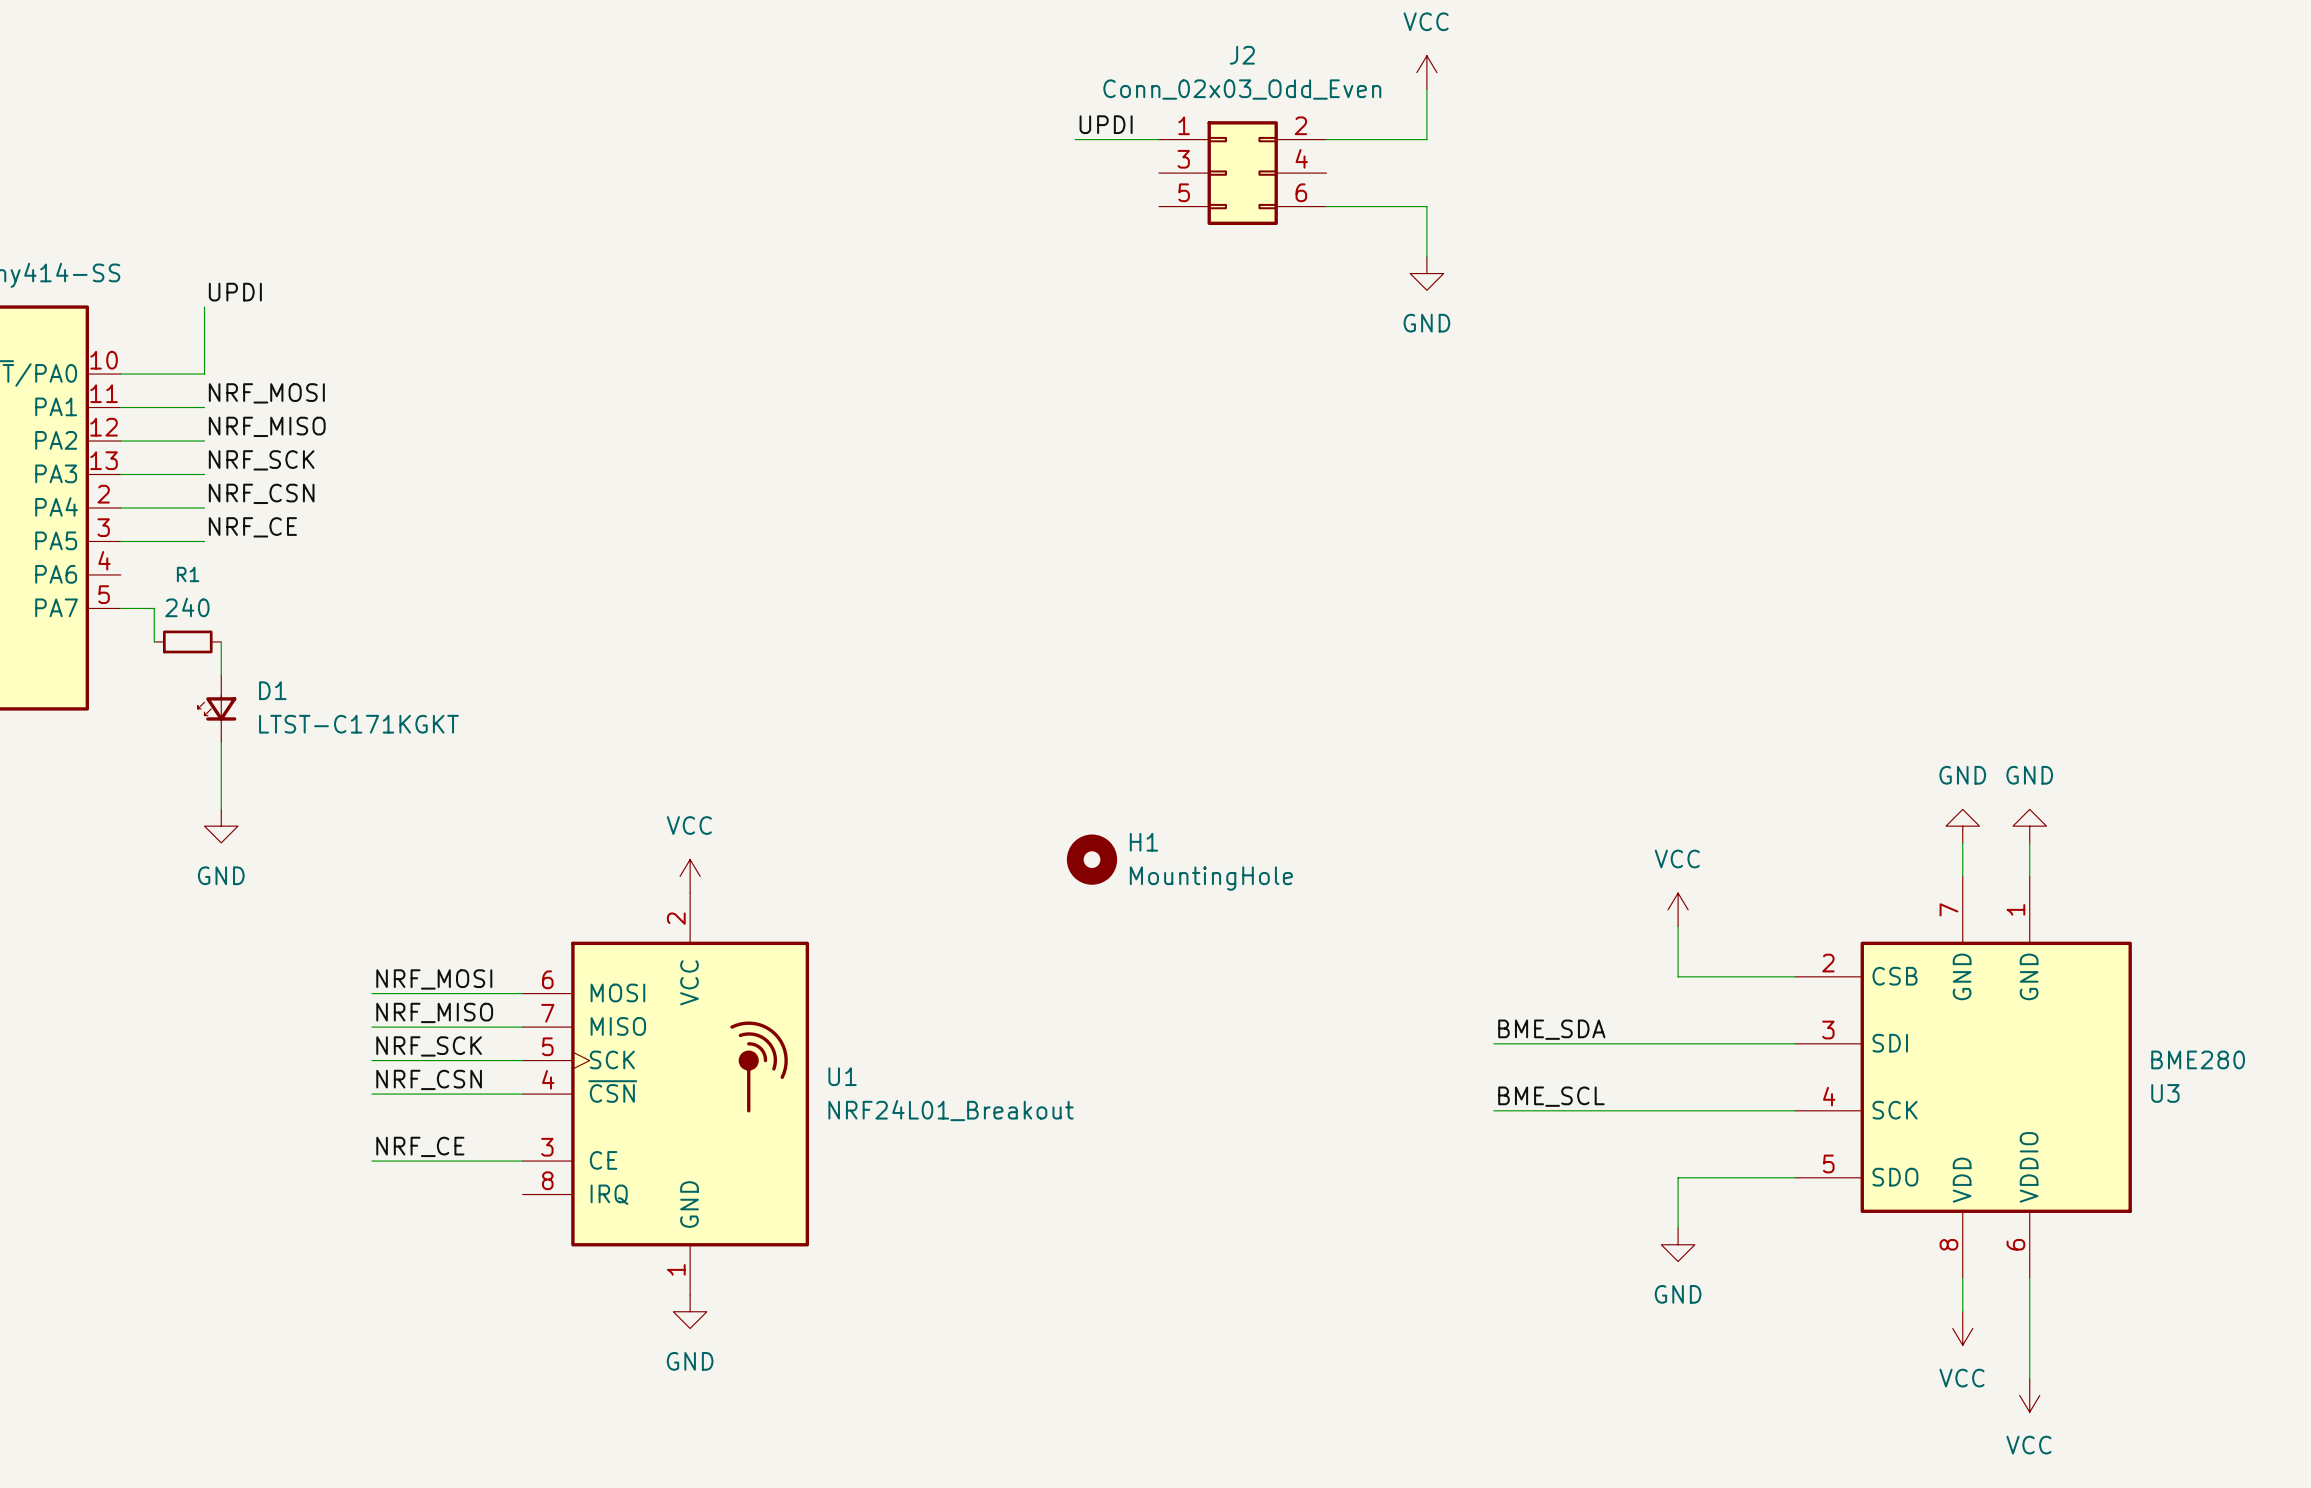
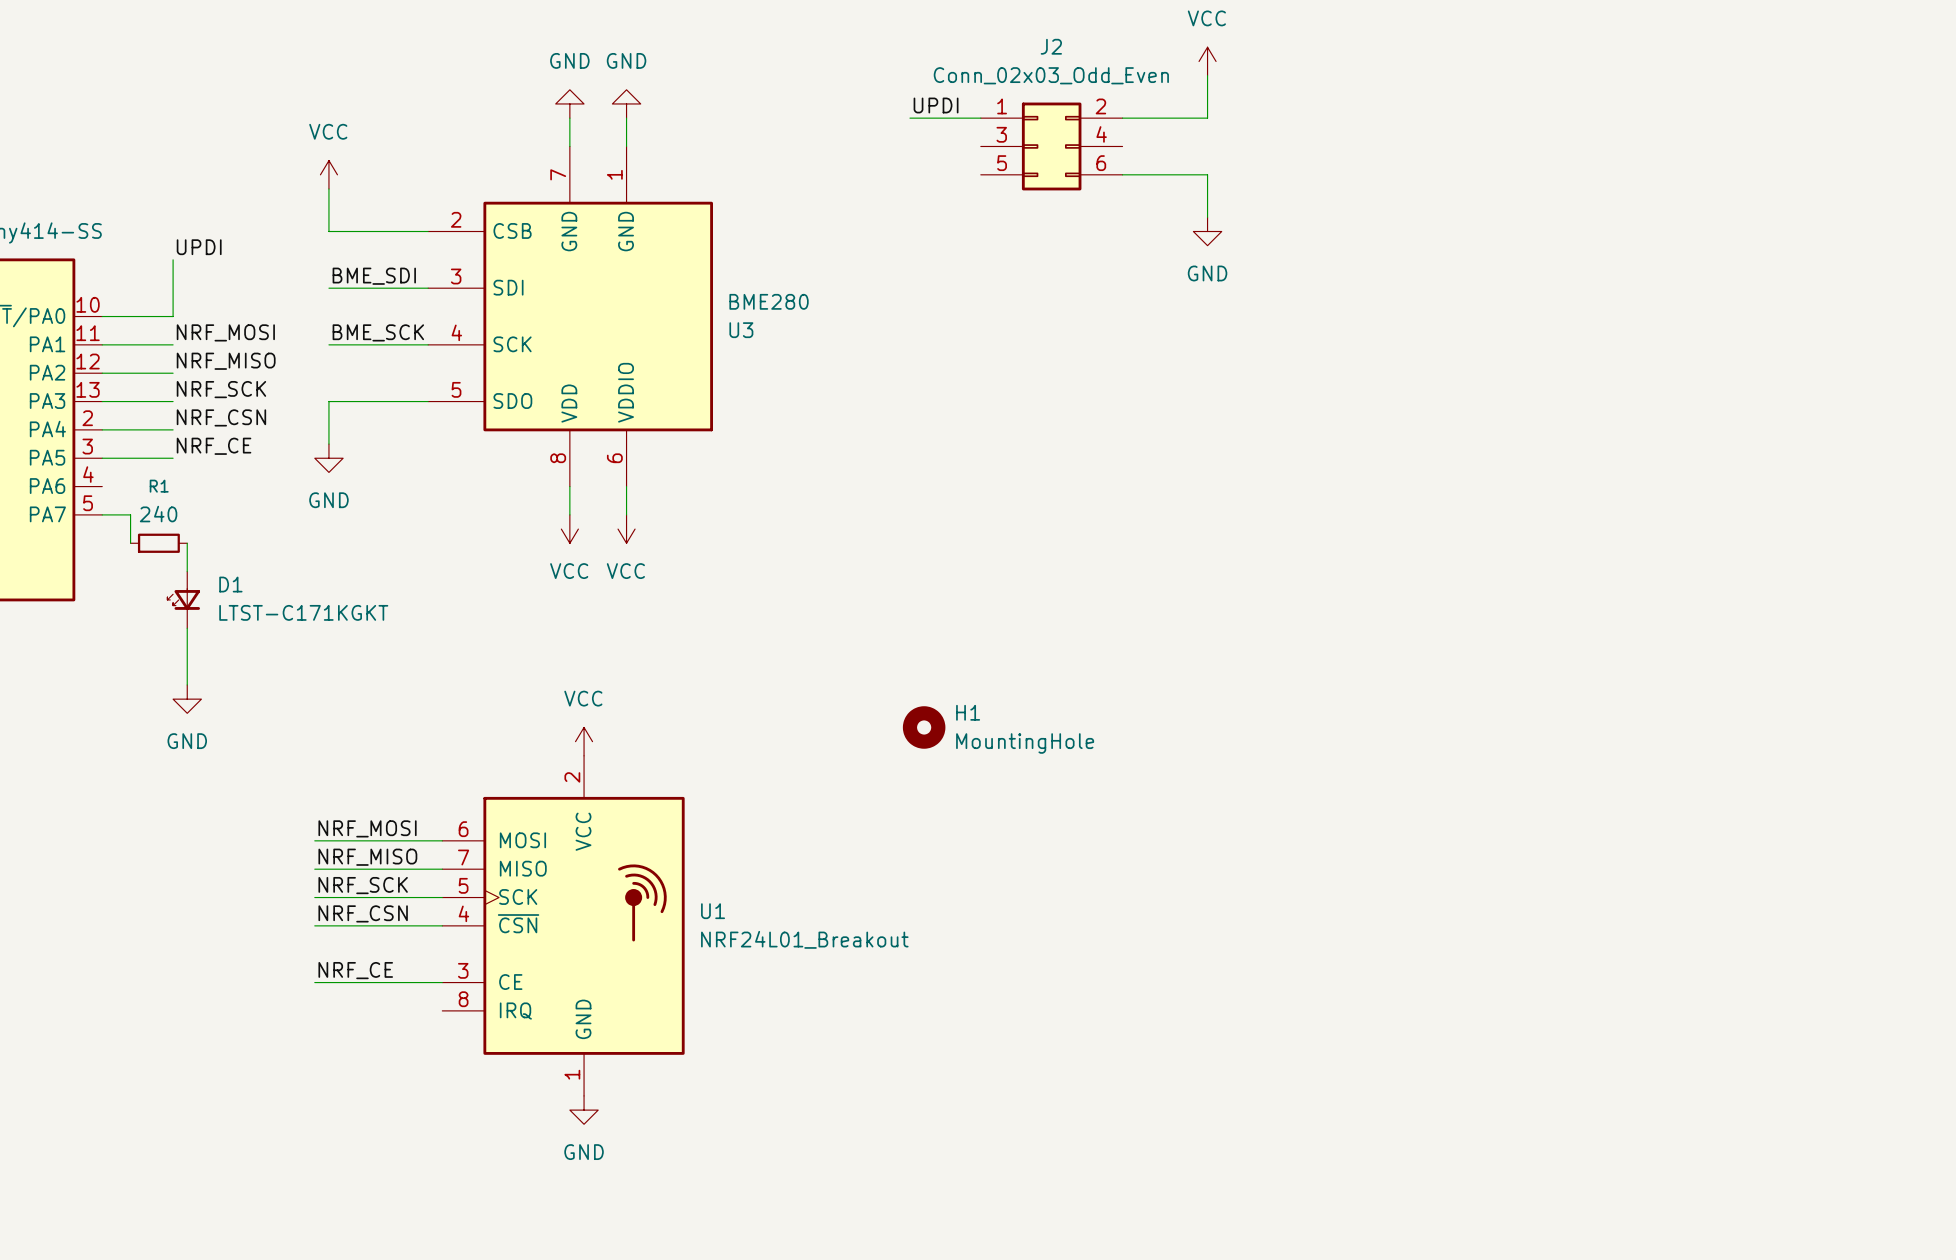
power symbol: none -> GND (569, 103)
power symbol: none -> GND (626, 103)
wire: none -> (569, 118) (569, 146)
wire: none -> (626, 118) (626, 146)
power symbol: none -> VCC (328, 174)
wire: none -> (328, 188) (328, 231) (428, 231)
label: none -> BME_SDI (374, 276)
wire: none -> (328, 288) (428, 288)
label: none -> BME_SCK (378, 332)
wire: none -> (328, 344) (428, 344)
wire: none -> (428, 401) (328, 401) (328, 444)
power symbol: none -> GND (328, 458)
wire: none -> (569, 486) (569, 514)
wire: none -> (626, 486) (626, 514)
power symbol: none -> VCC (569, 529)
power symbol: none -> VCC (626, 529)
power symbol: GND (1962, 826) -> none
power symbol: GND (2029, 826) -> none
wire: (1962, 842) (1962, 876) -> none
wire: (2029, 842) (2029, 876) -> none
power symbol: VCC (1678, 909) -> none
wire: (1678, 926) (1678, 976) (1795, 976) -> none
label: BME_SDA (1551, 1029) -> none
wire: (1493, 1043) (1795, 1043) -> none
U3 position: (1963, 1077) -> (570, 316)
label: BME_SCL (1551, 1096) -> none
wire: (1493, 1110) (1795, 1110) -> none
wire: (1795, 1177) (1678, 1177) (1678, 1228) -> none
power symbol: GND (1678, 1244) -> none
wire: (1962, 1278) (1962, 1311) -> none
wire: (2029, 1278) (2029, 1378) -> none
power symbol: VCC (1962, 1328) -> none
power symbol: VCC (2029, 1395) -> none

